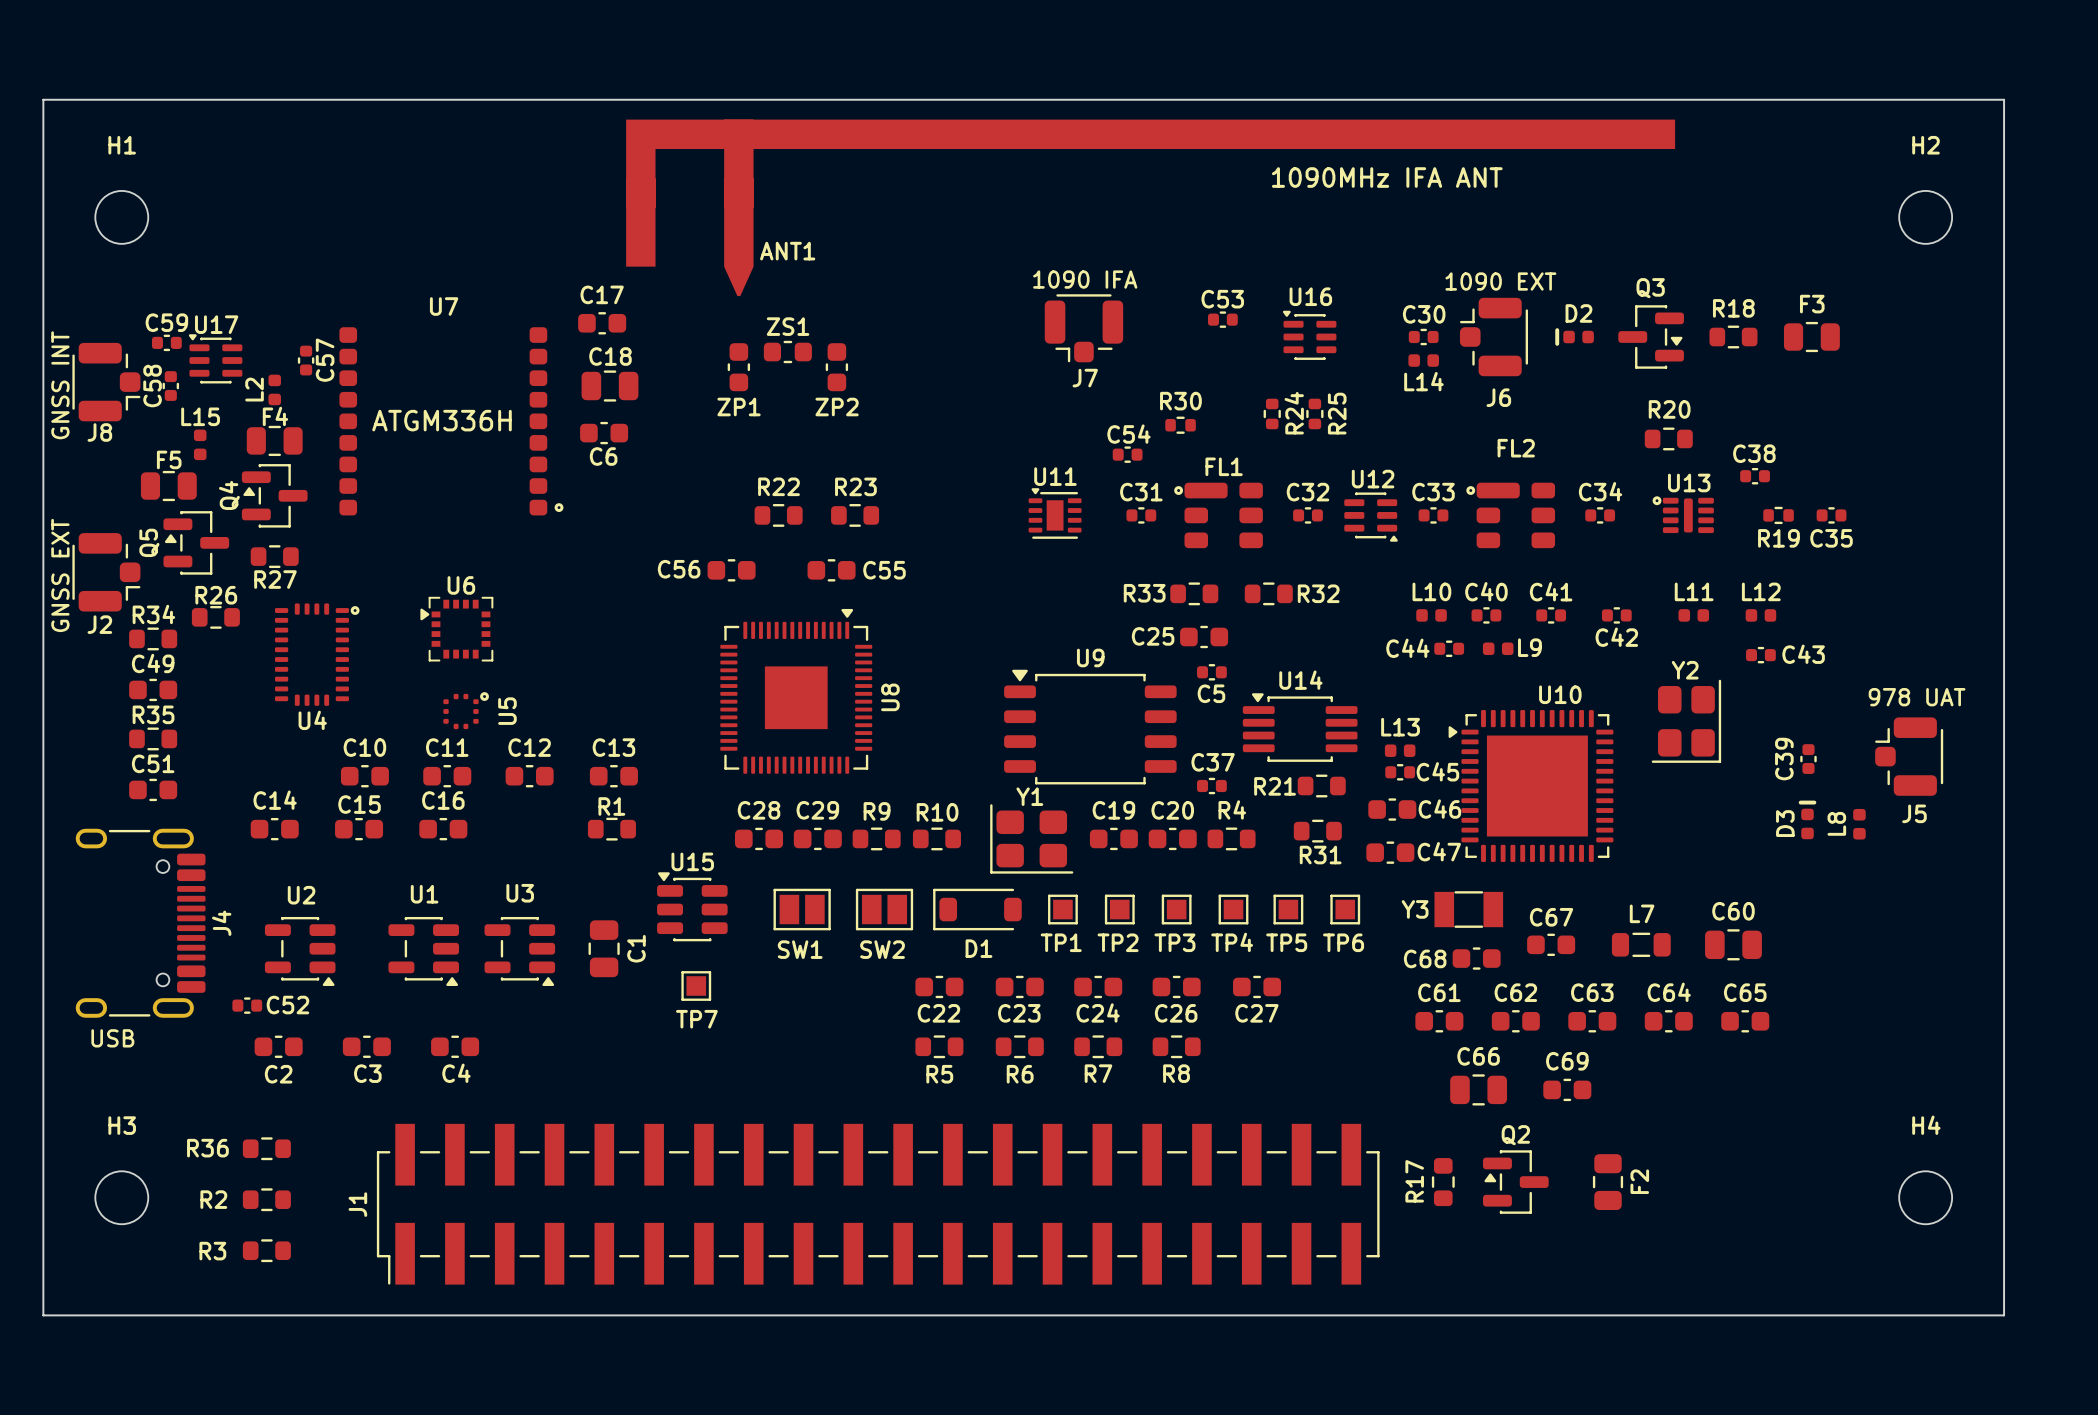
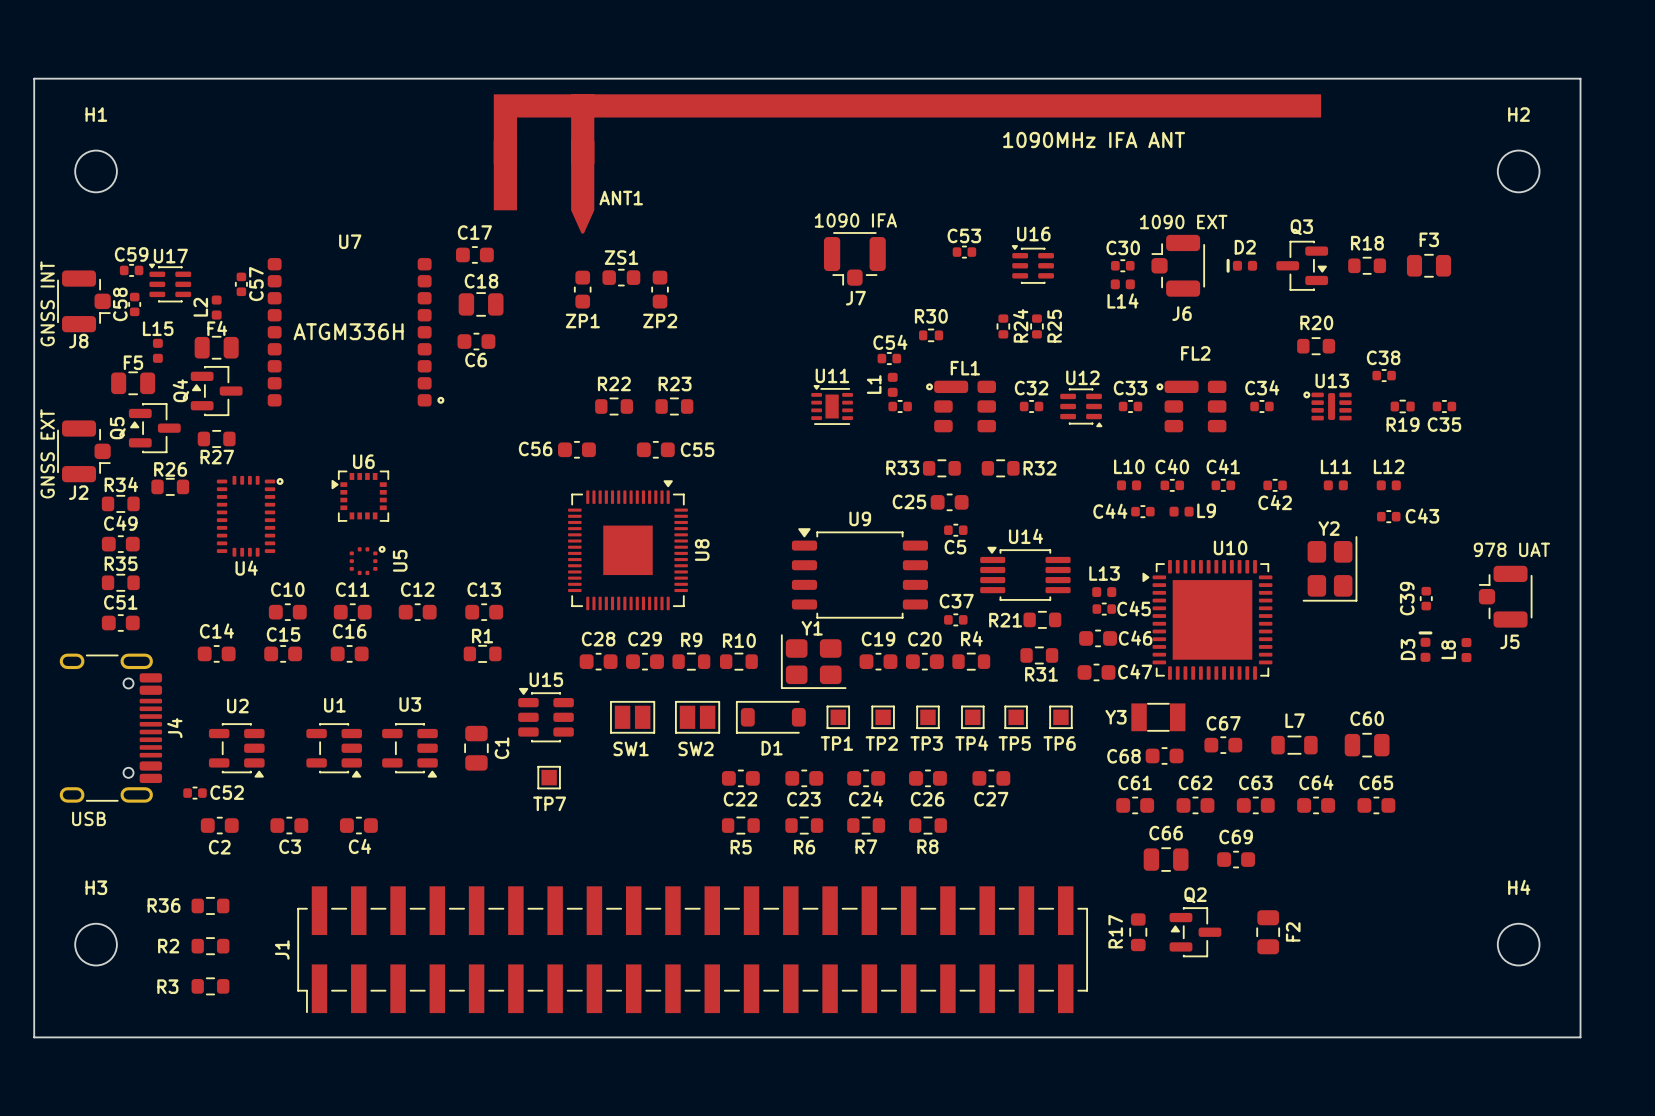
L1: none -> (892, 384)
C31 name: C31 (1141, 492) -> none

